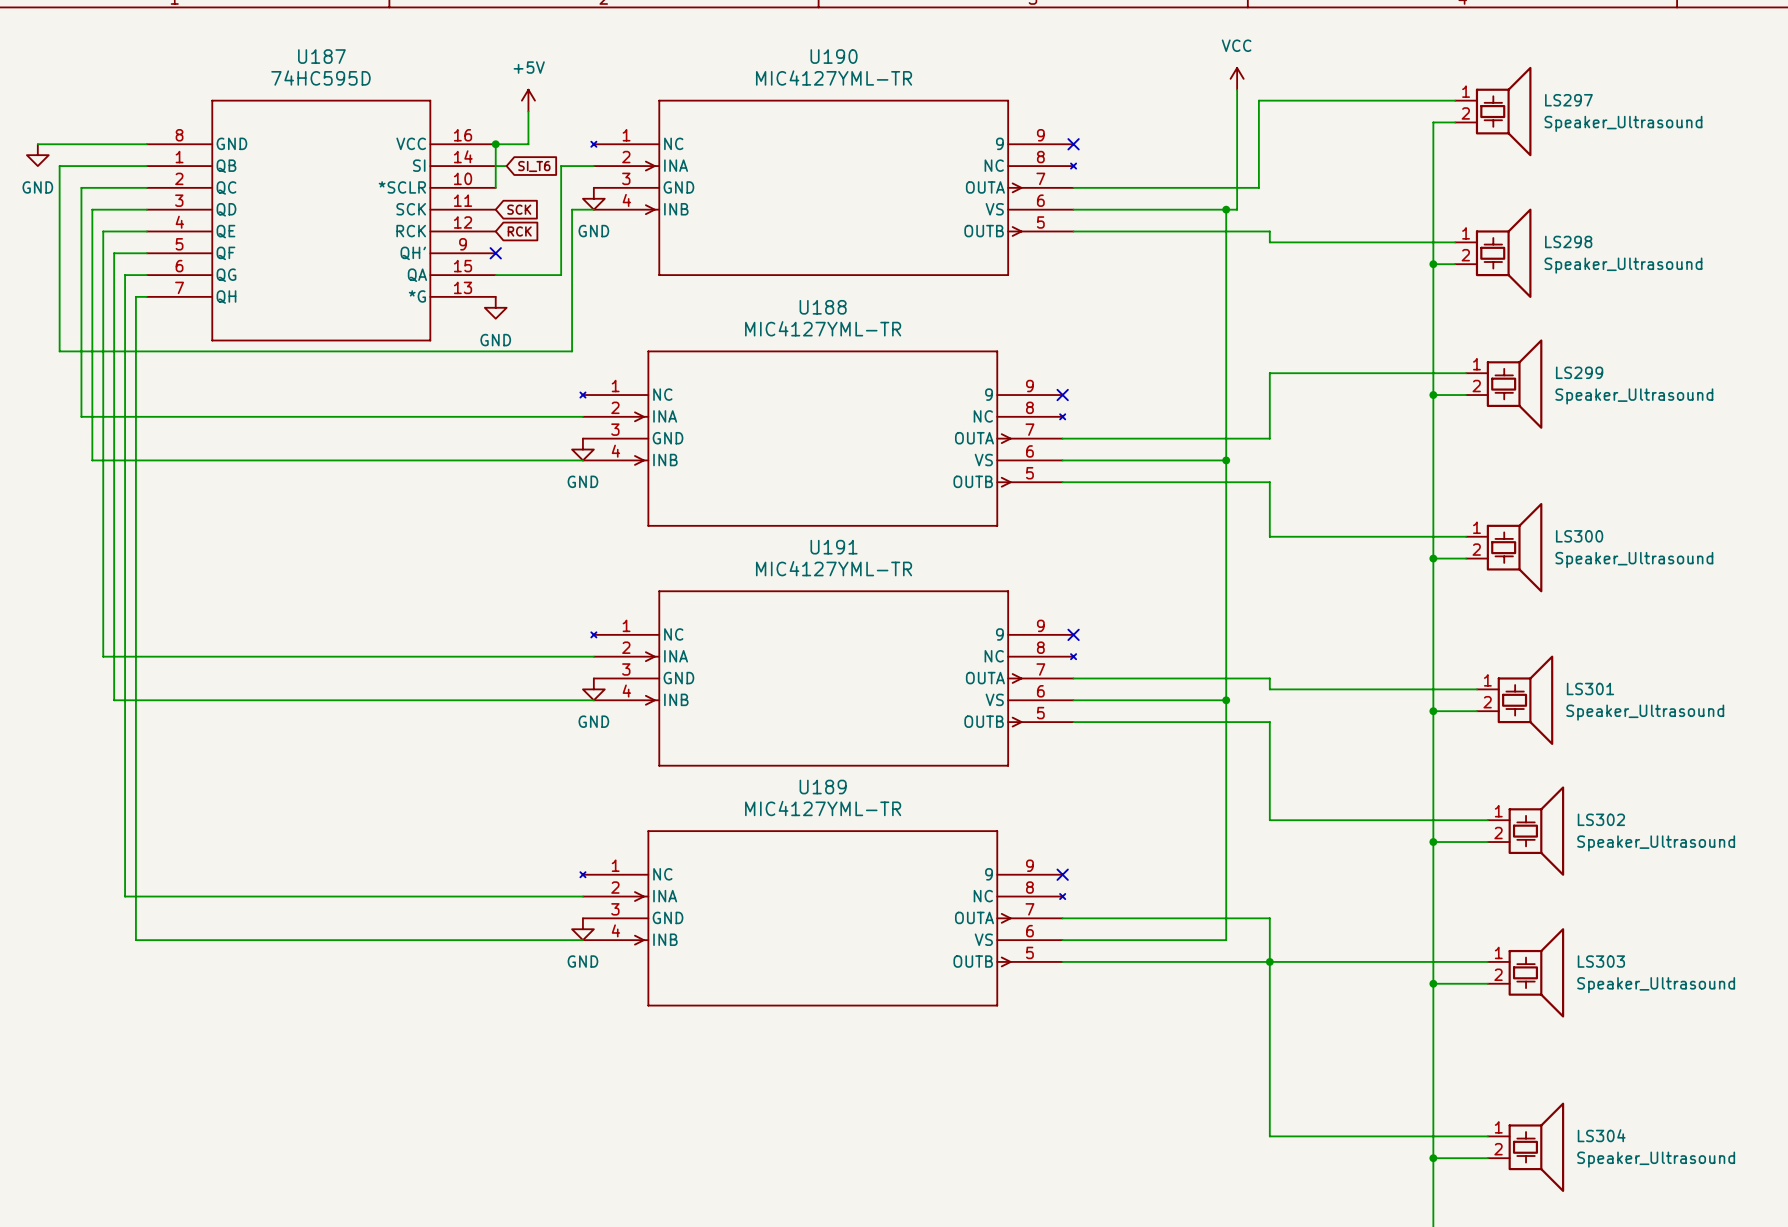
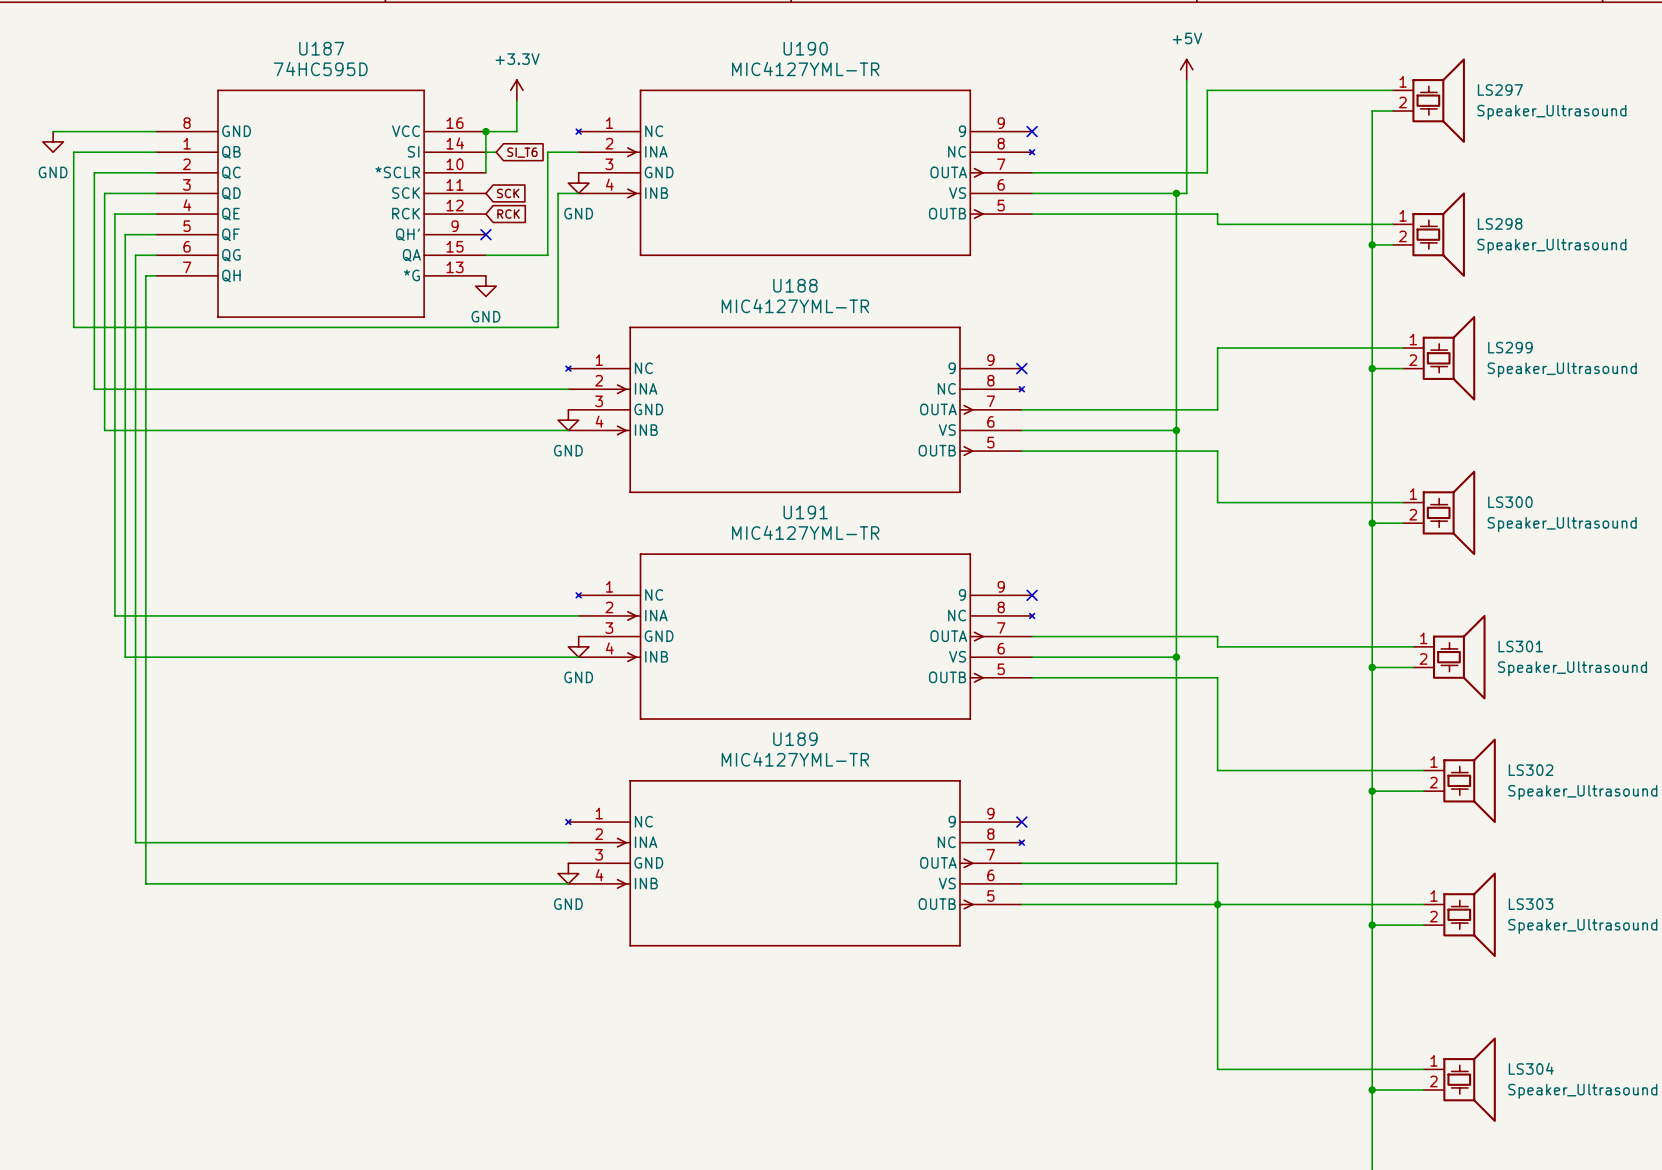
power symbol: VCC (1237, 78) -> +5V (1186, 69)
power symbol: +5V (528, 100) -> +3.3V (516, 90)

